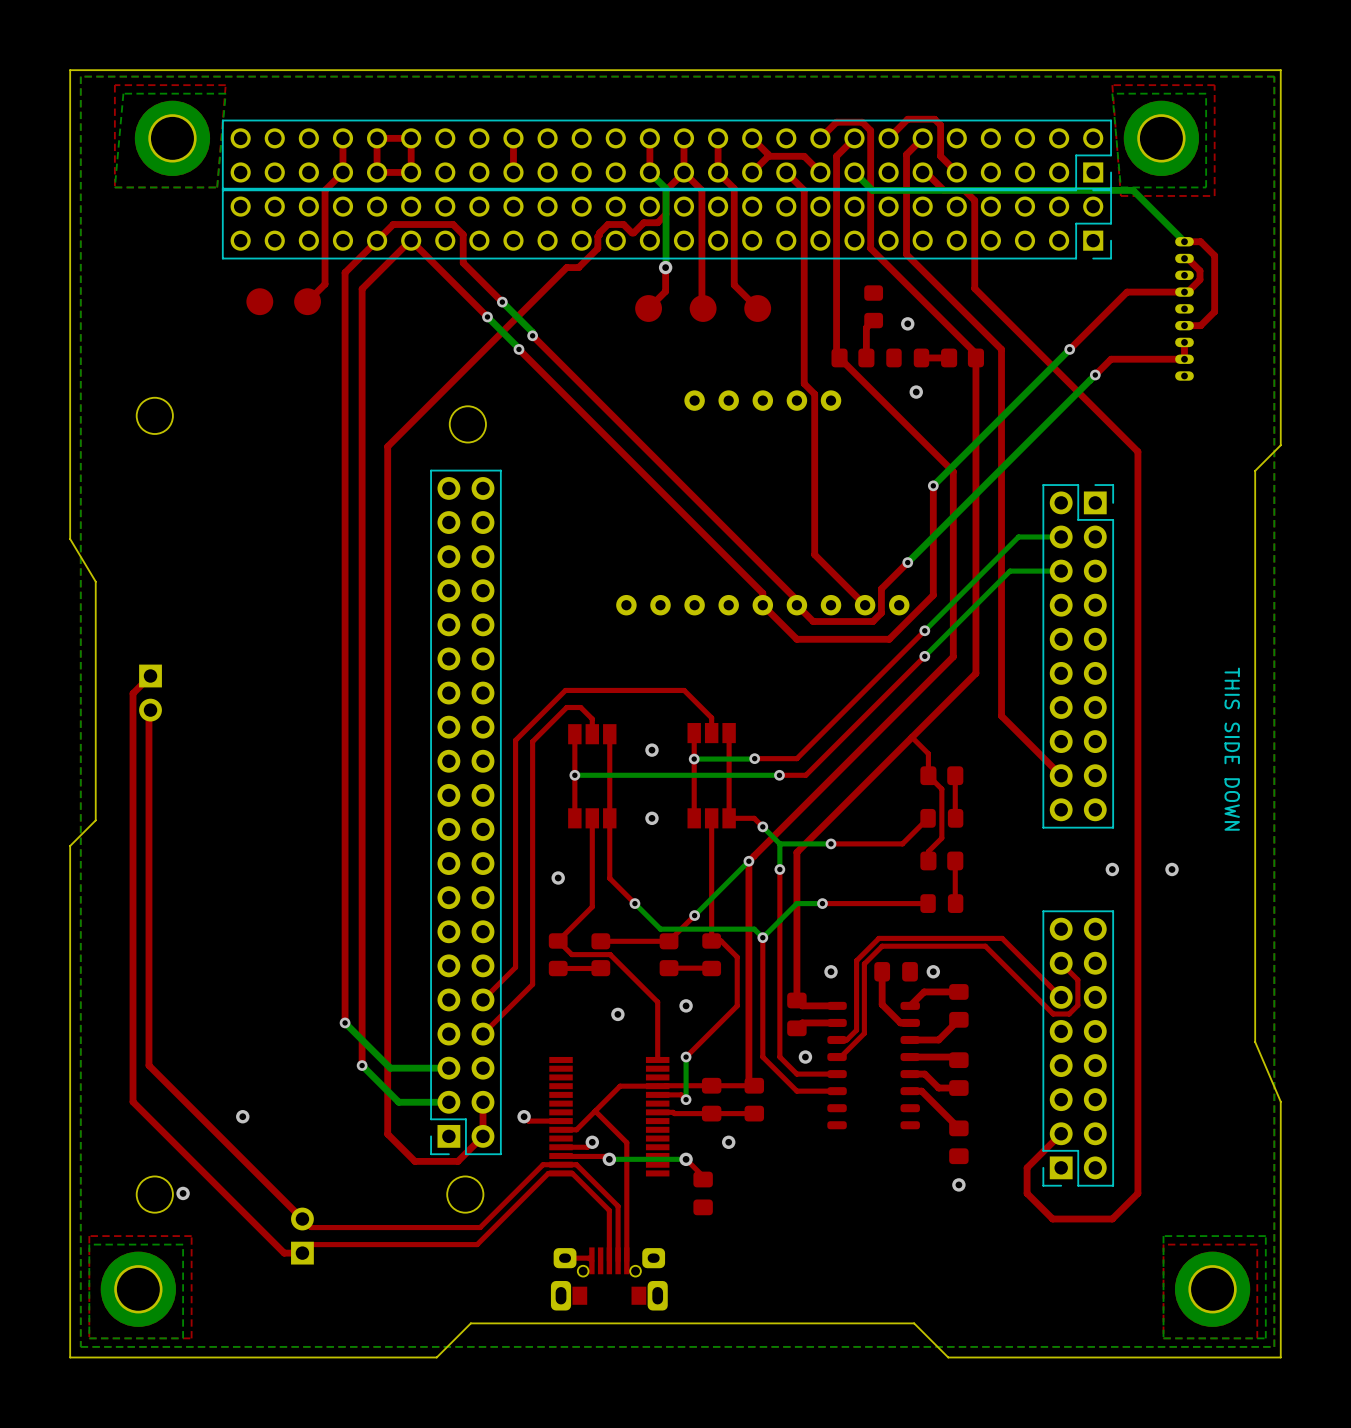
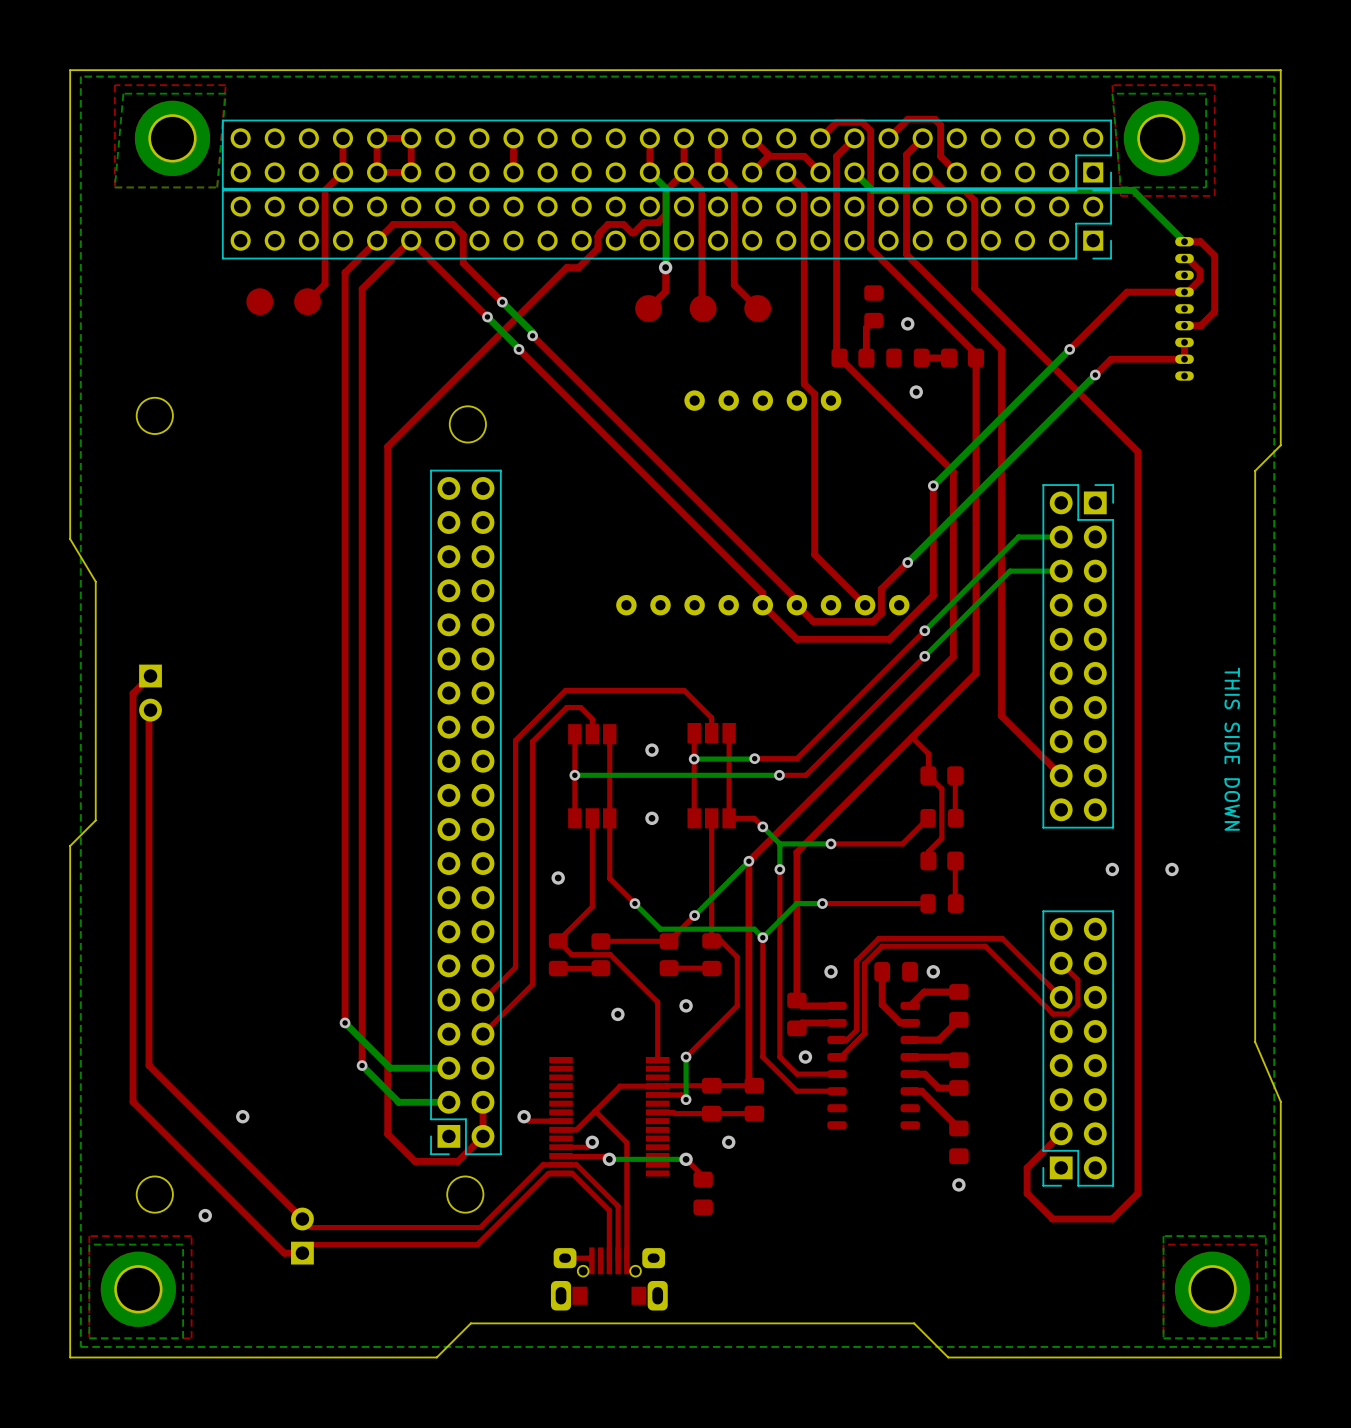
via position: (183, 1193) -> (205, 1215)

